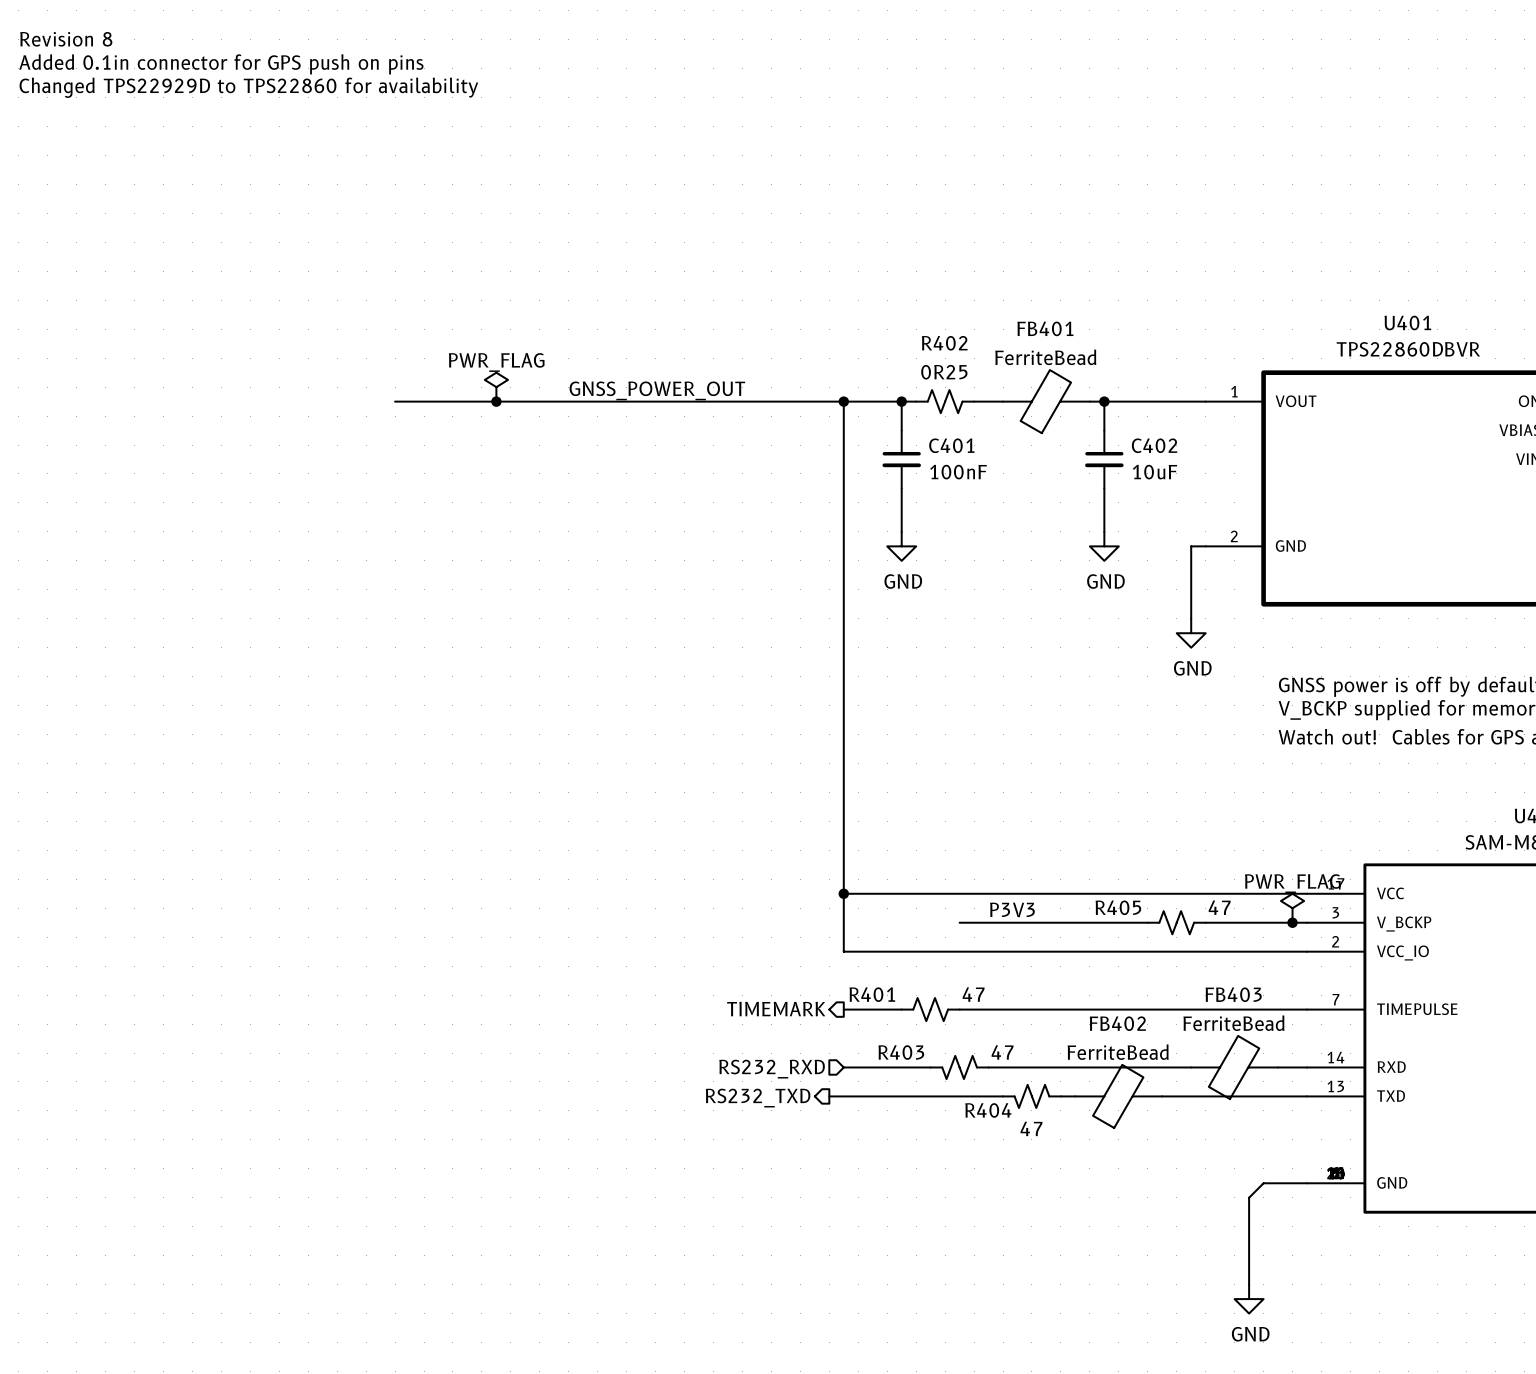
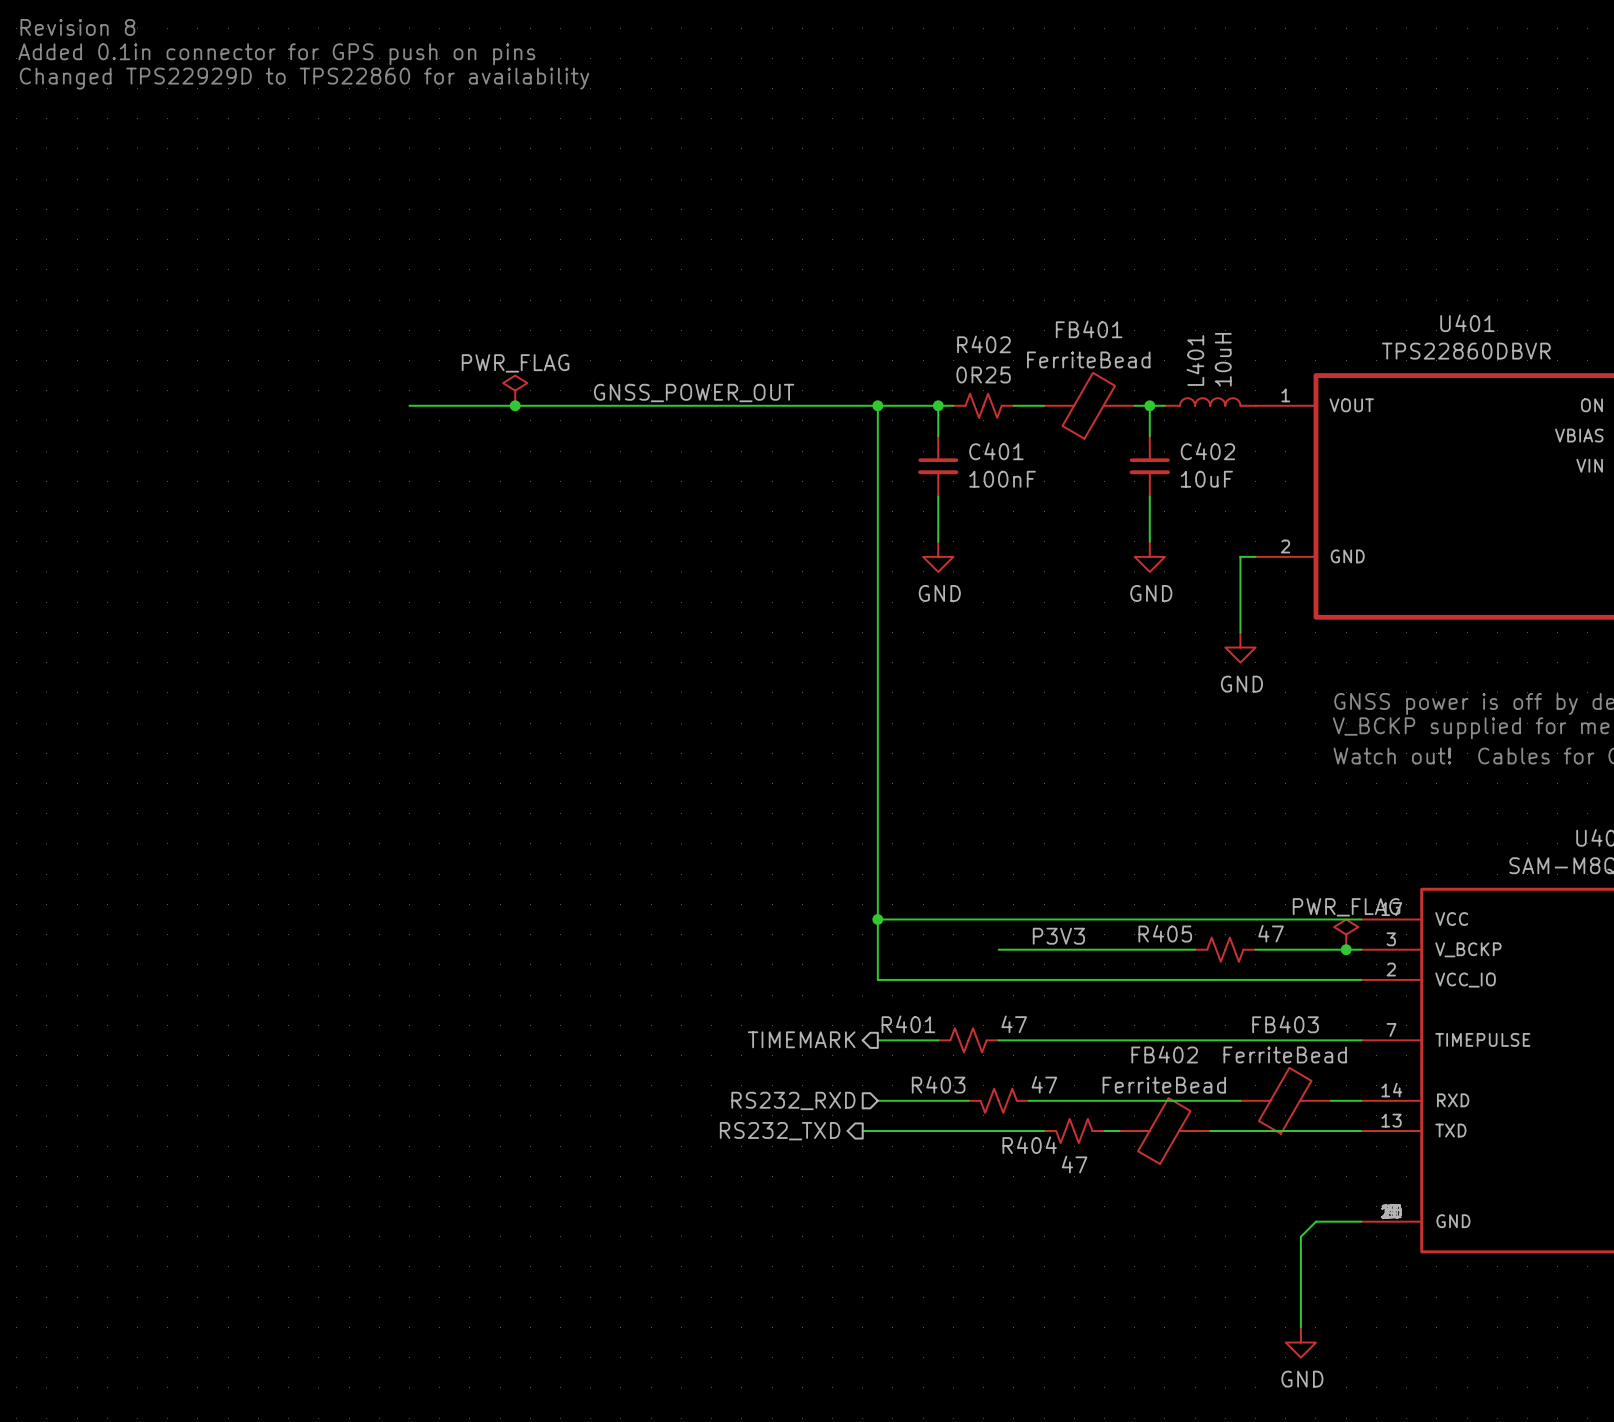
L401: none -> 10uH (1210, 401)
wire: (1118, 401) (1205, 401) -> none

